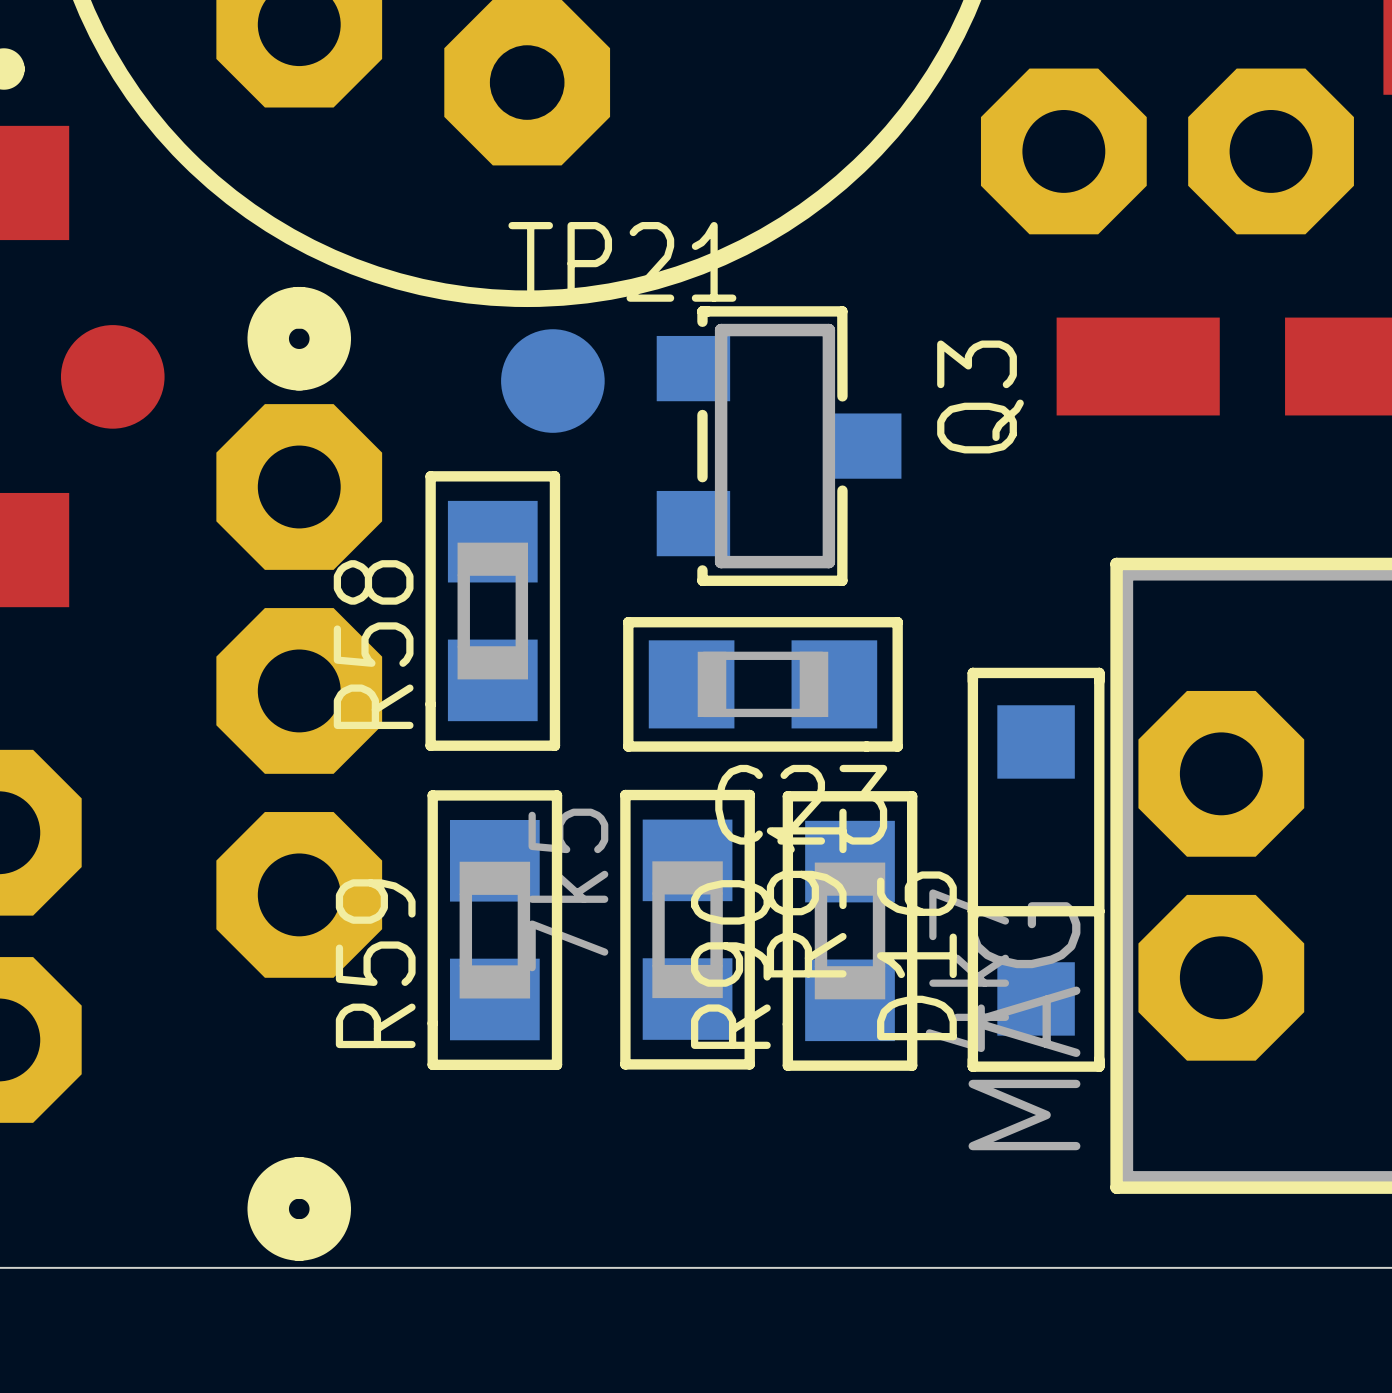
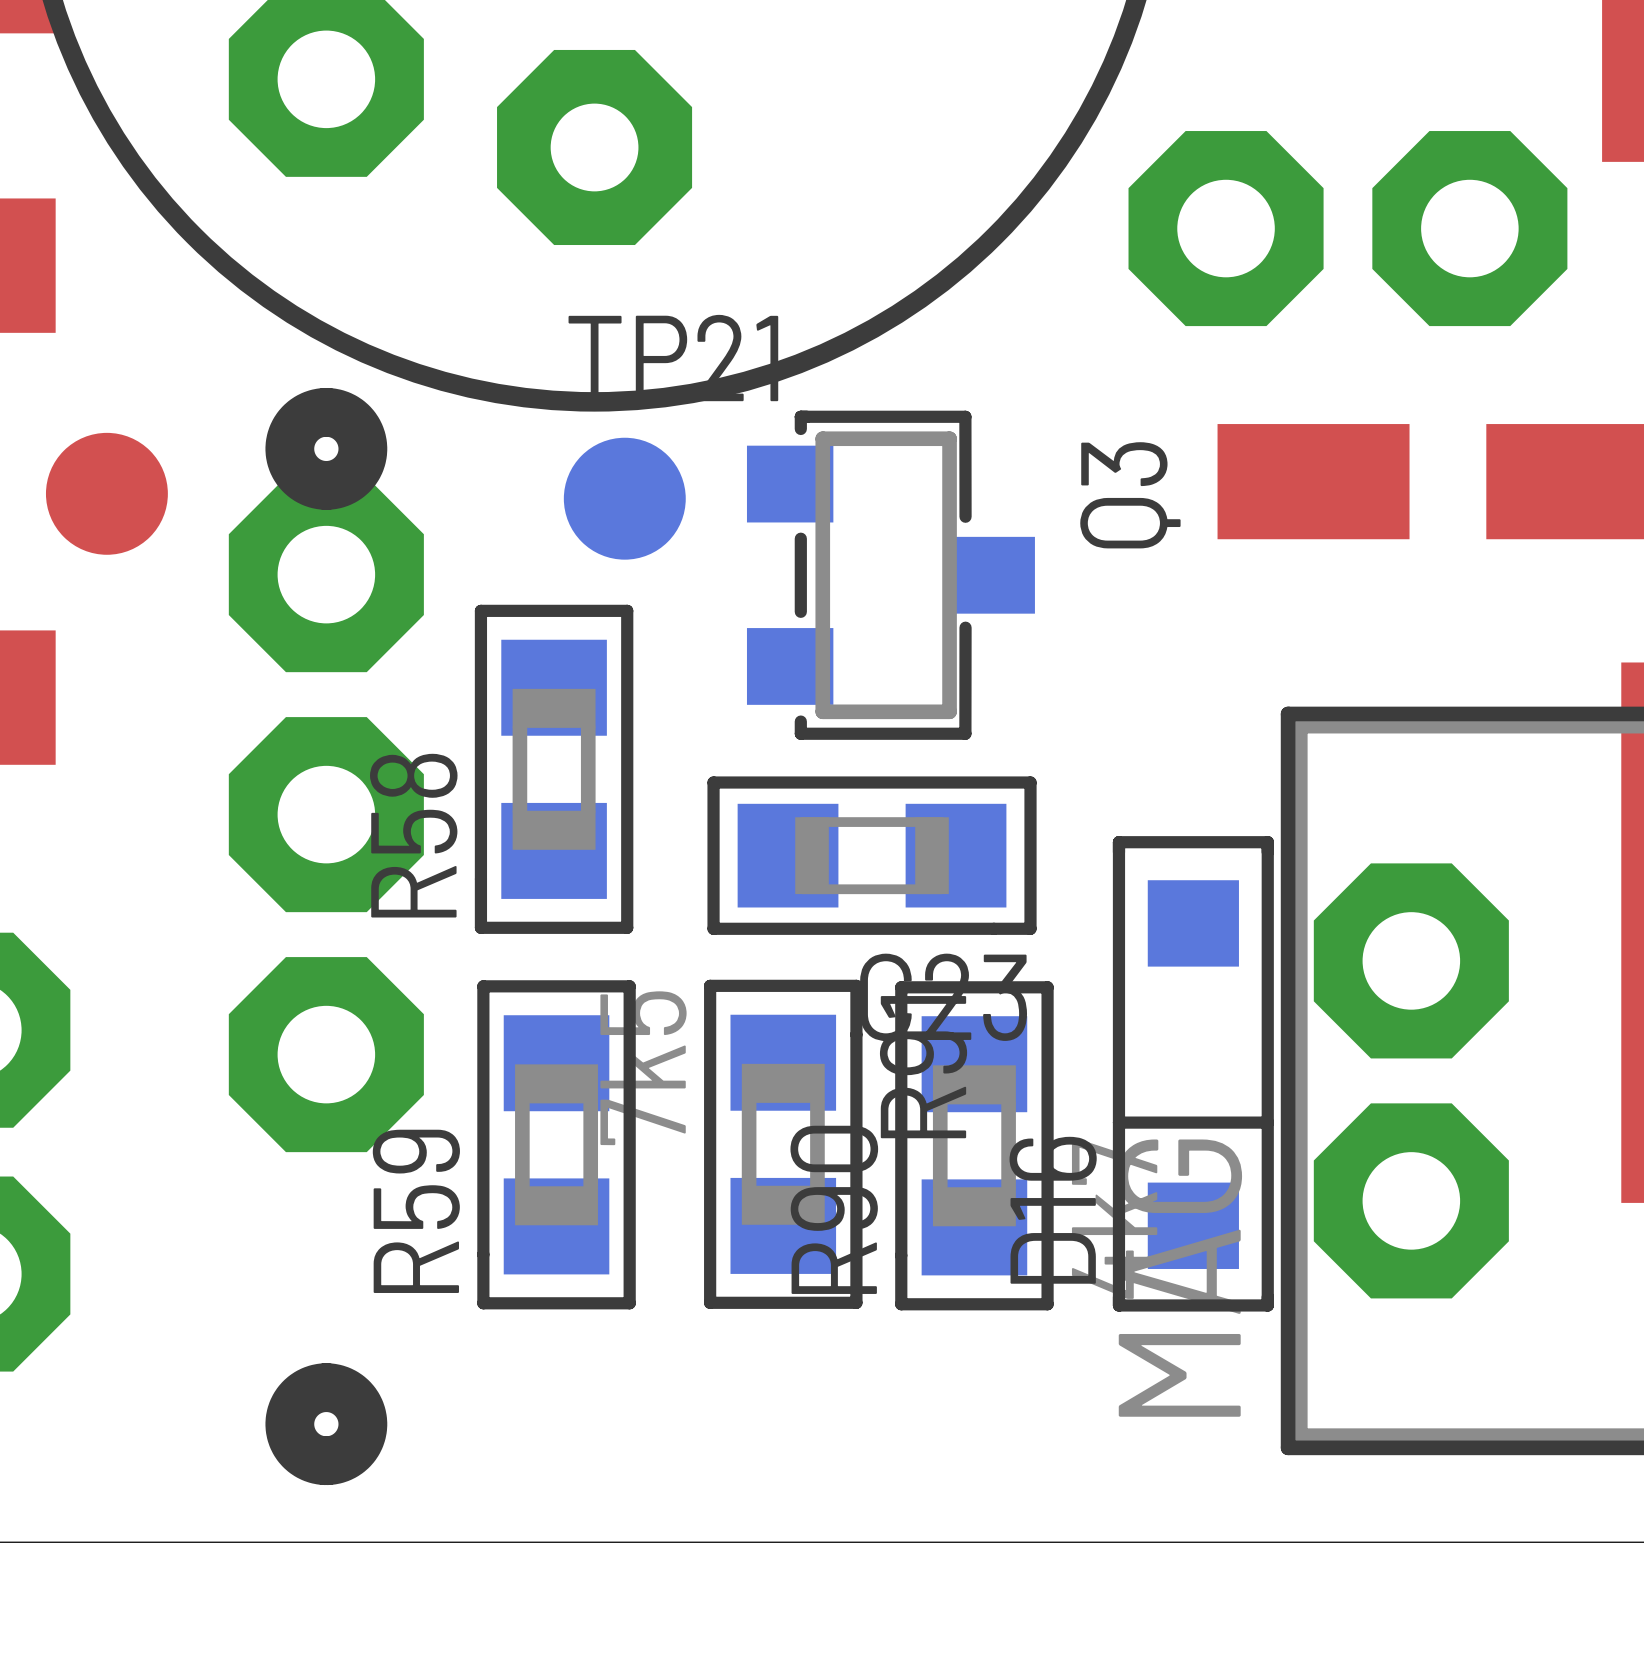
part position: (299, 832) -> (326, 981)

